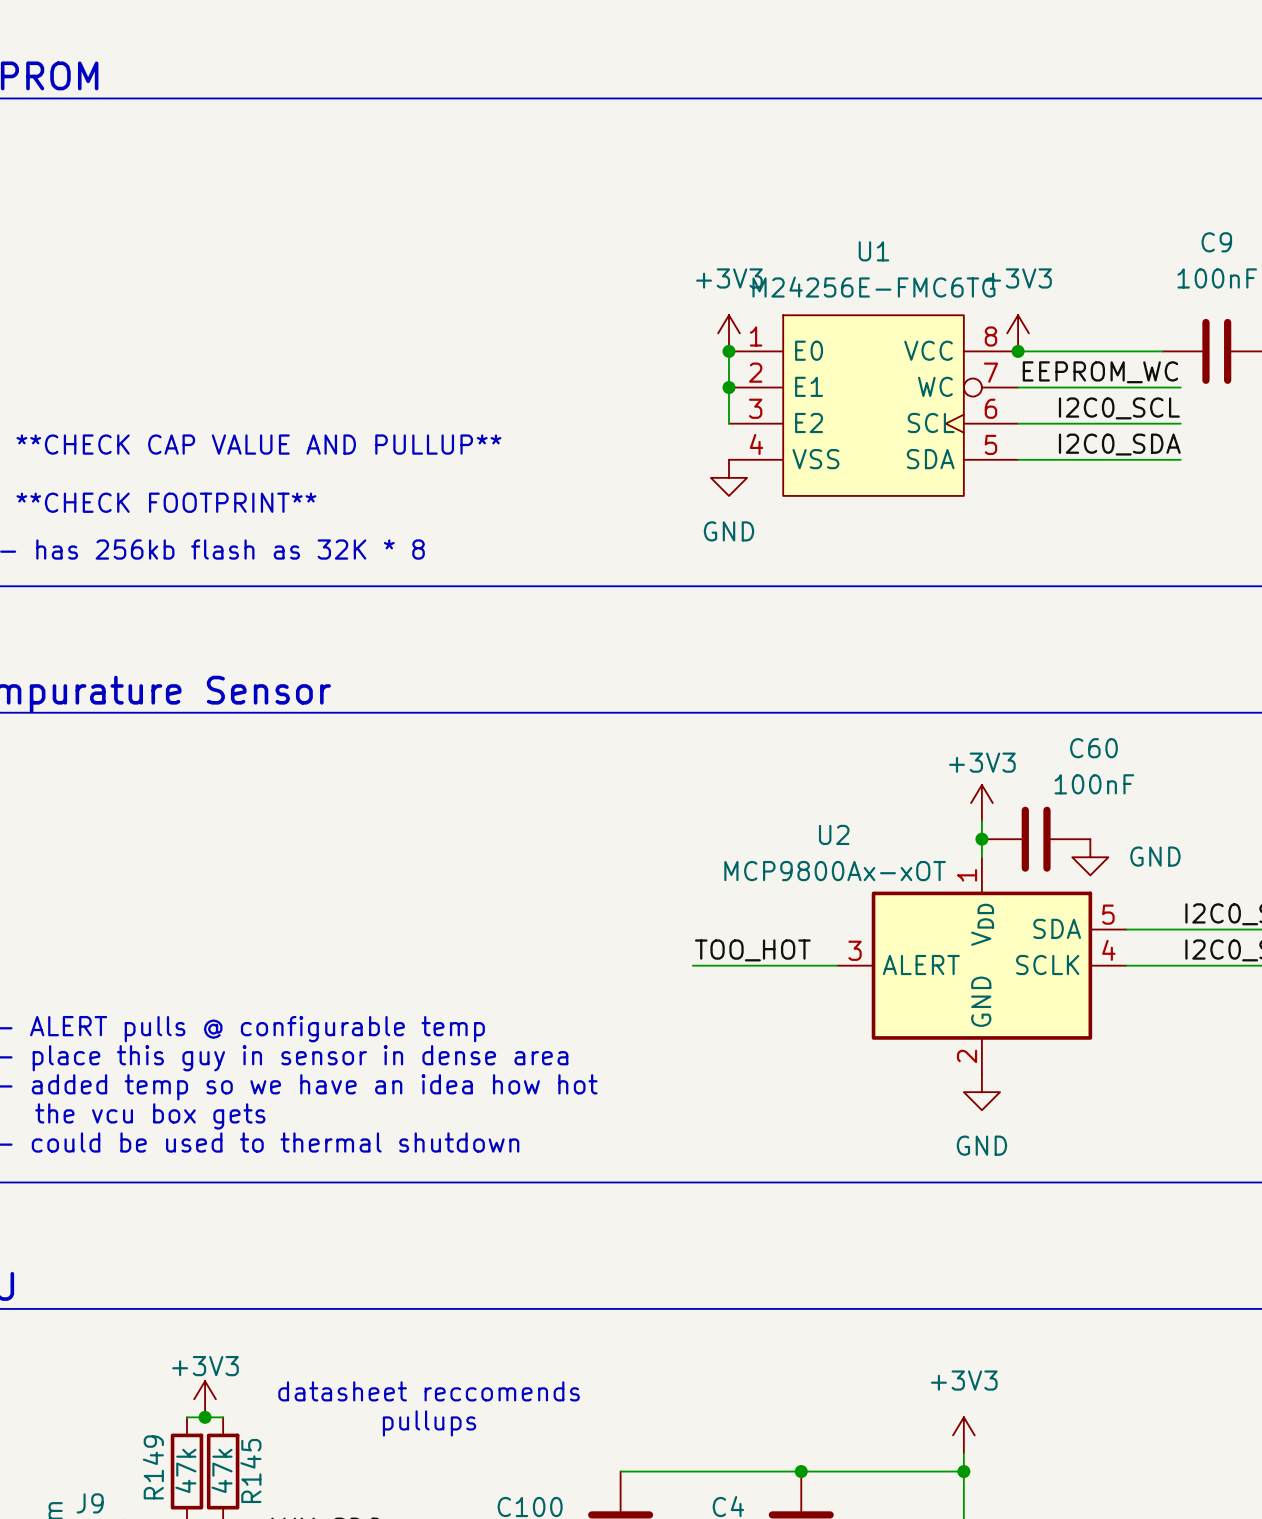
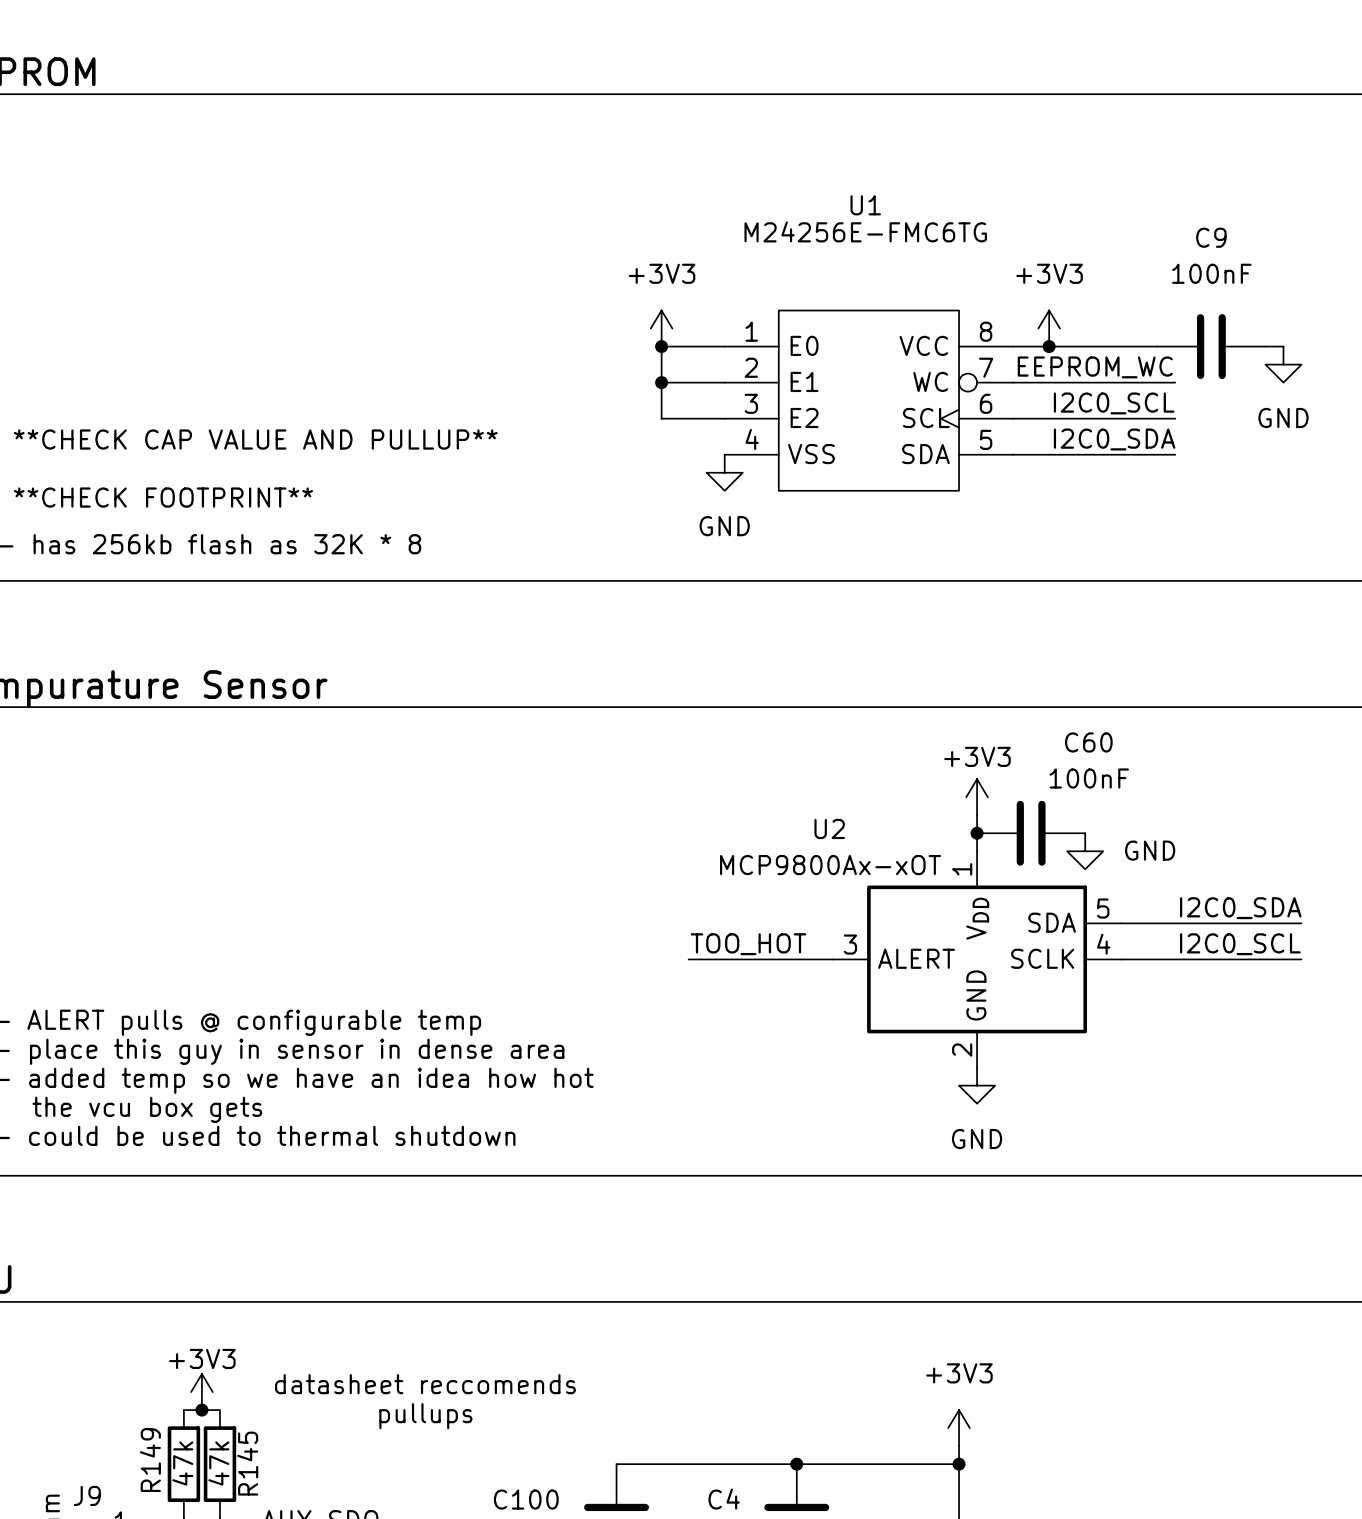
U1 name position: U1 (873, 251) -> U1 (865, 205)
U1 value position: M24256E-FMC6TG (873, 287) -> M24256E-FMC6TG (865, 231)
power symbol position: +3V3 (729, 333) -> +3V3 (661, 328)
power symbol position: +3V3 (1018, 333) -> +3V3 (1049, 328)
junction: none -> (661, 346)
wire: (729, 351) (729, 423) -> (724, 346) (661, 346) (661, 418) (724, 418)
junction: (729, 351) -> none
junction position: (1018, 351) -> (1049, 346)
wire: none -> (661, 382) (724, 382)
junction: none -> (661, 382)
junction: (729, 387) -> none

